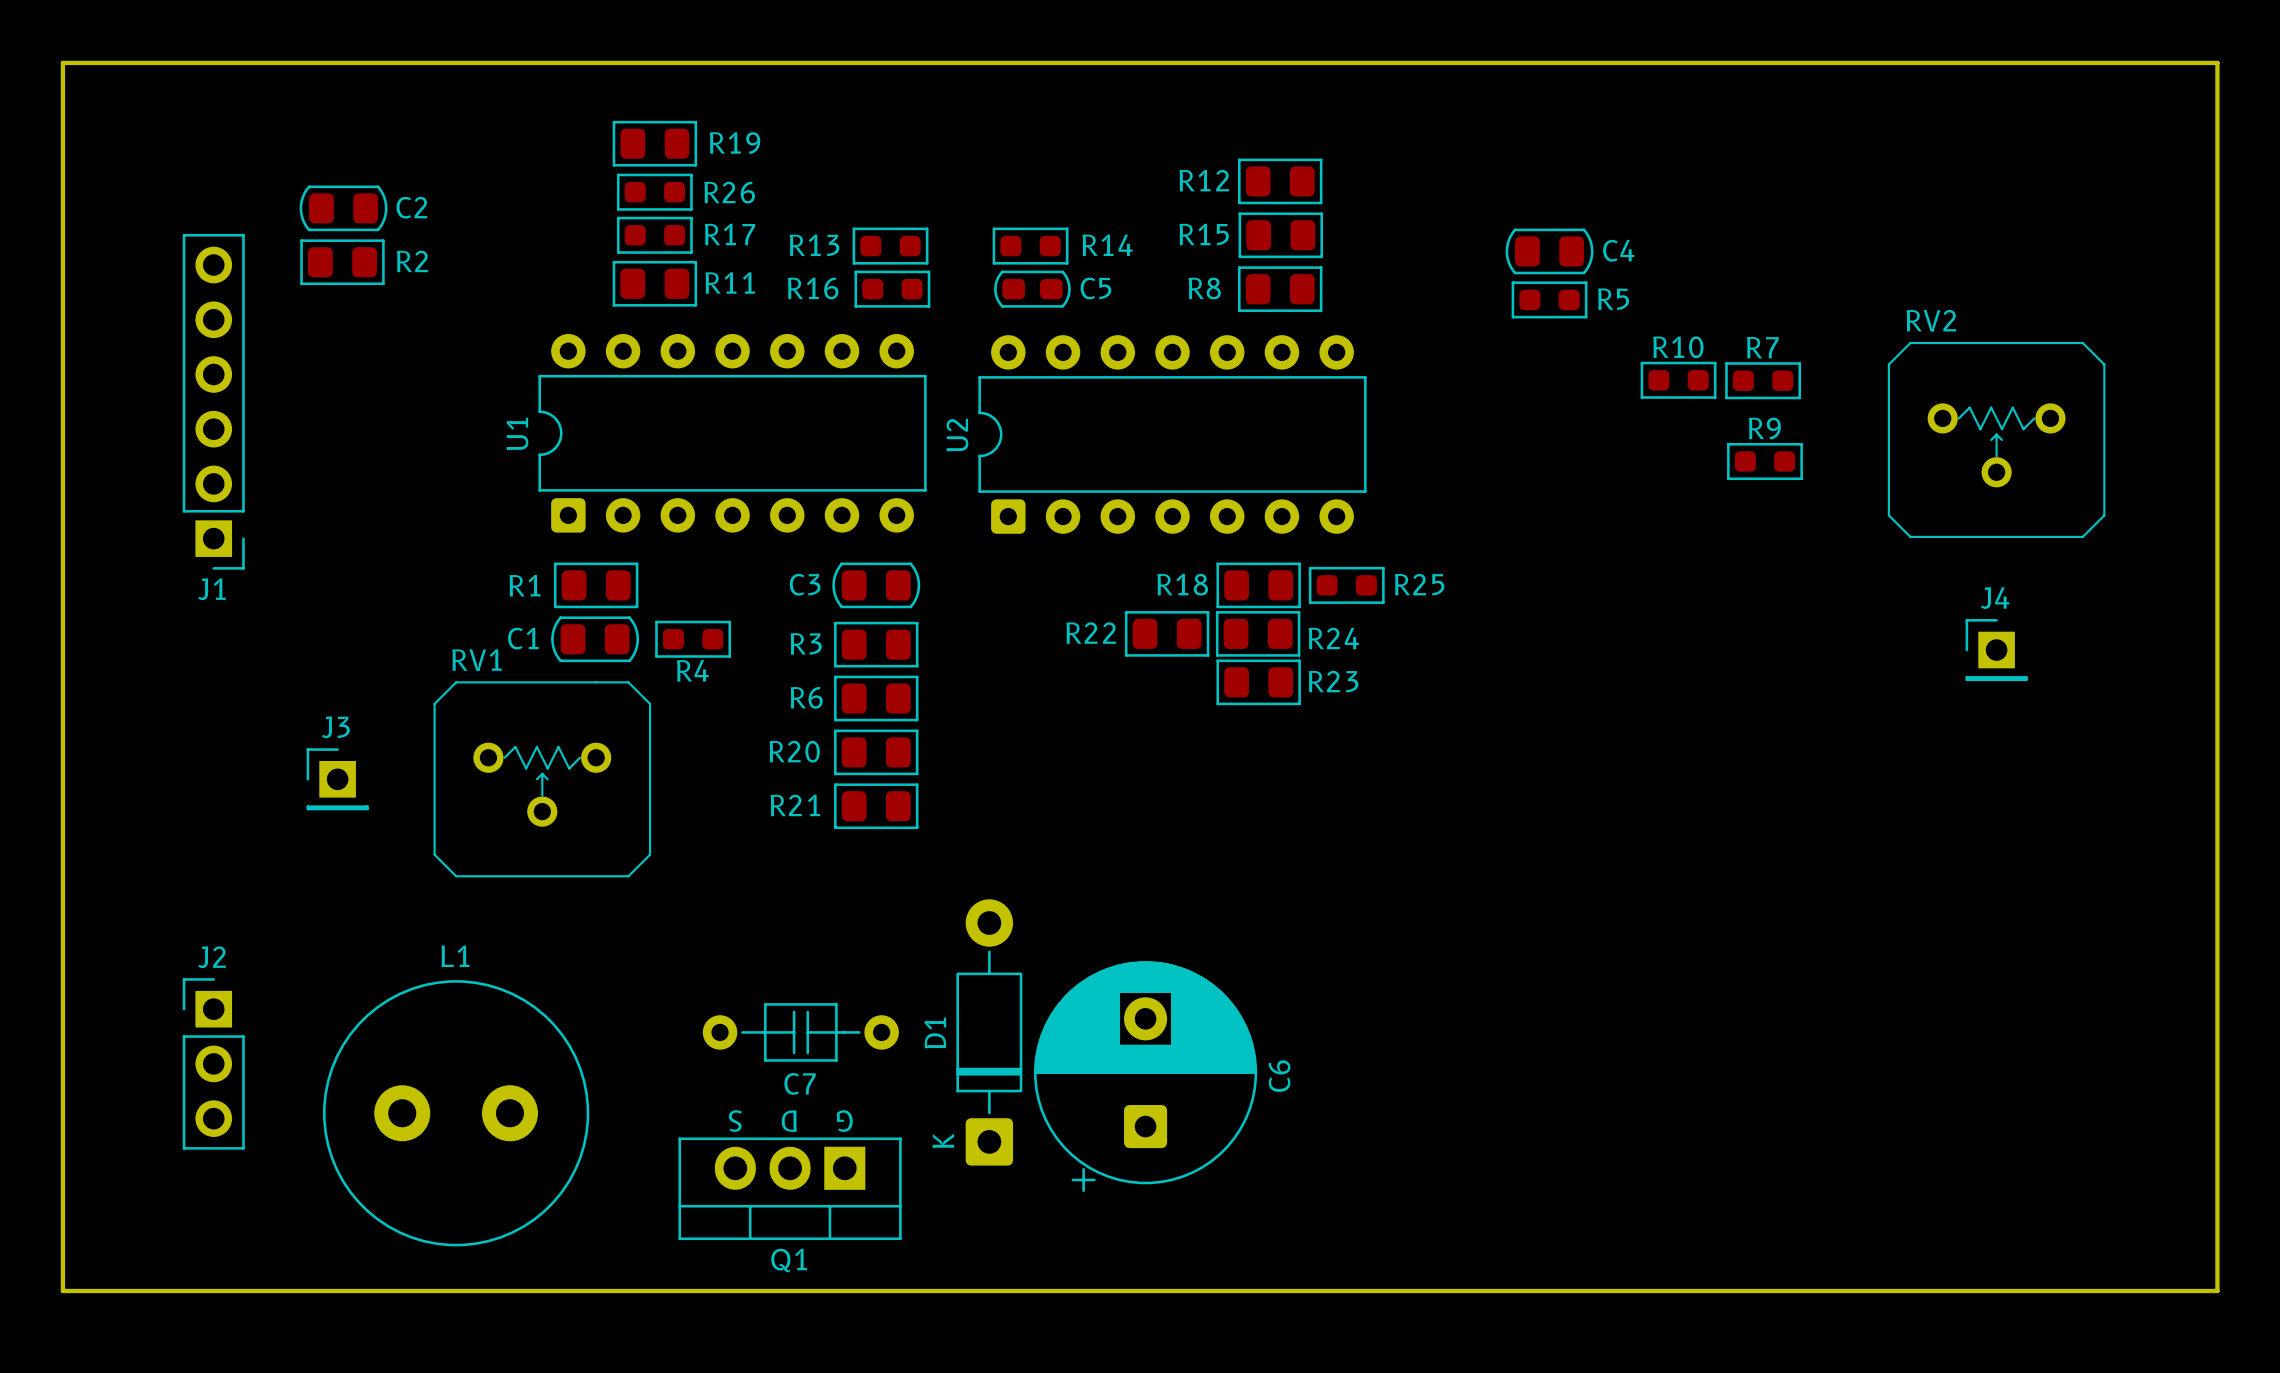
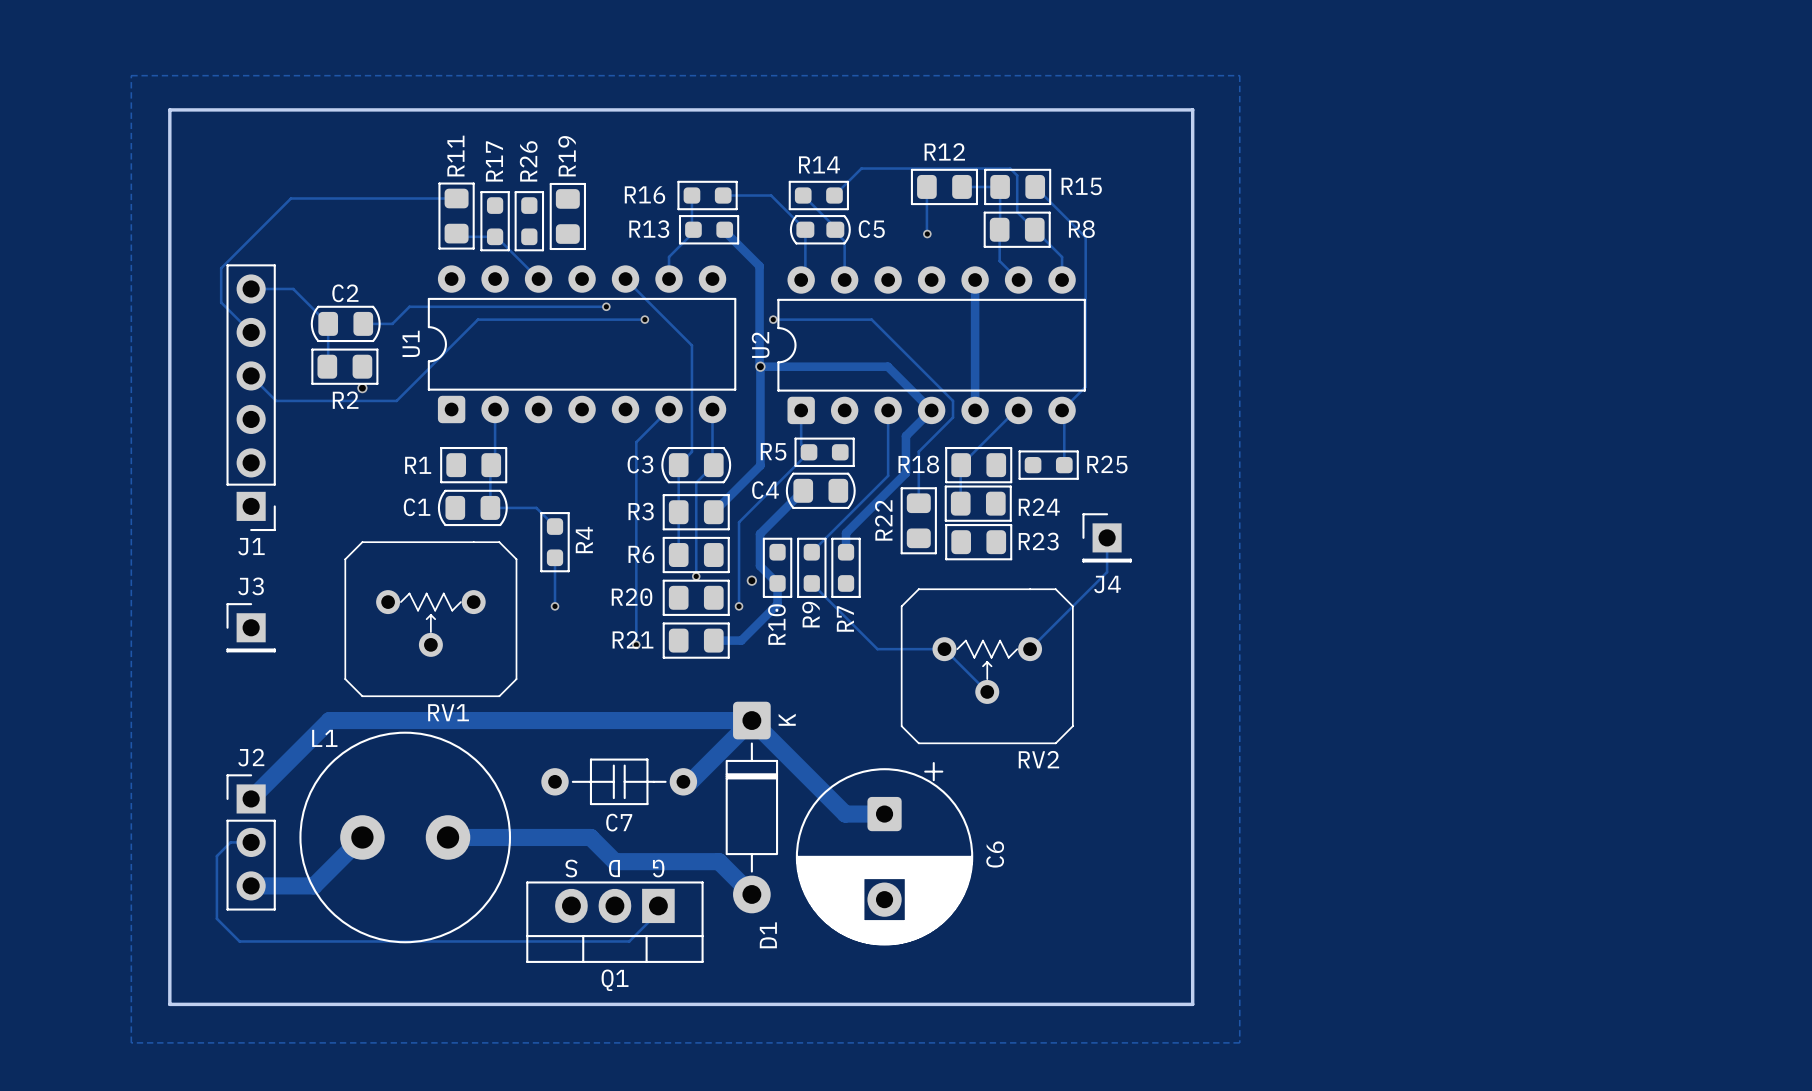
board edge: (62, 62) (2217, 62) (2217, 1291) (62, 1291) (62, 62) -> (169, 109) (169, 1004) (1192, 1004) (1192, 109) (169, 109)
zone outline: none -> (131, 75) (1239, 75) (1239, 1042) (131, 1042) (131, 75)
R19 rotation: 0° (654, 143) -> 90° clockwise (567, 216)
R19 position: (654, 143) -> (567, 216)
R19 name position: R19 (734, 143) -> R19 (567, 156)
R12 name position: R12 (1204, 180) -> R12 (944, 151)
R12 position: (1280, 181) -> (944, 186)
R26 rotation: 0° (654, 192) -> 90° clockwise (529, 221)
R26 position: (654, 192) -> (529, 221)
R26 name position: R26 (729, 192) -> R26 (528, 161)
C2 name position: C2 (411, 207) -> C2 (345, 293)
C2 position: (343, 208) -> (345, 323)
R17 name position: R17 (729, 234) -> R17 (494, 161)
R15 name position: R15 (1204, 234) -> R15 (1081, 186)
R17 rotation: 0° (654, 235) -> 90° clockwise (495, 221)
R17 position: (654, 235) -> (495, 221)
track: none -> (926, 186) (927, 234)
track: none -> (962, 186) (1000, 186) (999, 261) (1018, 279)
track: none -> (1035, 186) (1085, 237) (1085, 386) (1062, 410) (1064, 412) (1064, 465)
R13 name: R13 (814, 245) -> R16 (644, 195)
R14 name position: R14 (1107, 245) -> R14 (819, 164)
track: none -> (691, 195) (691, 234) (669, 256) (669, 279)
track: none -> (723, 195) (771, 195) (805, 229) (805, 275) (801, 279)
track: none -> (803, 195) (835, 227) (835, 231) (844, 241) (844, 279)
track: none -> (834, 195) (861, 168) (1010, 168) (1017, 175) (1017, 212) (1062, 257) (1062, 279)
track: none -> (456, 198) (290, 198) (221, 268) (221, 302) (251, 332)
C4 name position: C4 (1618, 250) -> C4 (765, 490)
C4 position: (1549, 251) -> (820, 490)
R2 name position: R2 (412, 261) -> R2 (345, 400)
R2 position: (342, 262) -> (344, 366)
R11 name position: R11 (730, 282) -> R11 (455, 156)
R11 rotation: 0° (654, 283) -> 90° clockwise (456, 216)
R11 position: (654, 283) -> (456, 216)
R16 name: R16 (813, 288) -> R13 (649, 229)
R8 name position: R8 (1204, 288) -> R8 (1081, 229)
track: none -> (723, 229) (759, 266) (760, 366)
track: none -> (456, 233) (459, 236) (496, 236) (538, 279)
via: none -> (927, 234)
R5 position: (1549, 299) -> (824, 452)
R5 name position: R5 (1613, 299) -> R5 (773, 451)
RV2 name position: RV2 (1931, 320) -> RV2 (1038, 759)
R10 name position: R10 (1678, 347) -> R10 (776, 624)
R7 name position: R7 (1762, 347) -> R7 (845, 618)
track: none -> (625, 279) (691, 345) (691, 451) (678, 465) (678, 555)
track: none -> (975, 279) (975, 410)
track: none -> (251, 288) (293, 288) (328, 323) (327, 366)
R10 rotation: 0° (1678, 380) -> 90° clockwise (777, 567)
R10 position: (1678, 380) -> (777, 567)
R7 rotation: 0° (1763, 380) -> 90° clockwise (846, 567)
R7 position: (1763, 380) -> (846, 567)
track: none -> (606, 306) (409, 306) (392, 323) (363, 323)
via: none -> (606, 306)
J1 position: (213, 401) -> (251, 397)
track: none -> (644, 319) (477, 319) (396, 400) (276, 400) (251, 375)
via: none -> (644, 319)
track: none -> (773, 319) (871, 319) (953, 400) (953, 417) (918, 451) (918, 503) (911, 495)
via: none -> (773, 319)
R9 name position: R9 (1764, 428) -> R9 (811, 614)
RV2 position: (1996, 439) -> (987, 666)
track: none -> (760, 366) (887, 366) (931, 410) (905, 436) (905, 473) (846, 533) (846, 552)
track: none -> (760, 366) (760, 465) (713, 512)
via: none -> (760, 366)
R9 rotation: 0° (1764, 461) -> 90° clockwise (811, 567)
R9 position: (1764, 461) -> (811, 567)
via: none -> (362, 388)
track: none -> (495, 409) (495, 461) (491, 465) (490, 470) (490, 507) (536, 507) (555, 526)
track: none -> (669, 409) (636, 442) (636, 644)
track: none -> (712, 409) (713, 465) (696, 482) (696, 576)
track: none -> (801, 410) (801, 444) (809, 452) (739, 522) (739, 606)
track: none -> (888, 410) (888, 475) (811, 552)
track: none -> (1018, 410) (1015, 410) (960, 465) (960, 503)
R18 position: (1258, 585) -> (978, 465)
R25 position: (1346, 585) -> (1048, 465)
J4 name position: J4 (1995, 598) -> J4 (1107, 584)
track: none -> (803, 490) (759, 534) (759, 565) (777, 583) (777, 604) (741, 640) (713, 640)
R22 rotation: 0° (1167, 633) -> 90° clockwise (918, 520)
R24 position: (1258, 633) -> (978, 503)
R4 rotation: 0° (693, 639) -> 90° clockwise (555, 542)
J4 position: (1996, 650) -> (1107, 537)
RV1 name position: RV1 (476, 660) -> RV1 (448, 712)
R4 name position: R4 (692, 670) -> R4 (584, 540)
track: none -> (1107, 537) (1107, 572) (1030, 649)
R23 position: (1258, 682) -> (978, 542)
track: none -> (555, 557) (555, 606)
via: none -> (696, 576)
via: none -> (751, 580)
track: none -> (811, 583) (877, 649) (944, 649) (987, 691)
via: none -> (555, 606)
via: none -> (739, 606)
J3 position: (337, 779) -> (251, 627)
via: none -> (636, 644)
track: none -> (751, 720) (845, 814) (884, 814)
track: none -> (751, 720) (329, 720) (251, 798)
track: none -> (751, 720) (690, 781) (683, 781)
L1 name position: L1 (455, 956) -> L1 (324, 738)
C7 position: (800, 1032) -> (619, 781)
D1 rotation: 0° (989, 1032) -> 180° (751, 807)
D1 name position: D1 (935, 1033) -> D1 (768, 935)
track: none -> (362, 837) (313, 885) (251, 885)
track: none -> (448, 837) (590, 837) (614, 861) (719, 861) (751, 894)
track: none -> (251, 842) (230, 842) (216, 856) (216, 918) (239, 941) (629, 941) (658, 912) (658, 905)
J2 position: (213, 1063) -> (251, 842)
C6 rotation: 0° (1145, 1076) -> 180° (884, 853)
L1 position: (456, 1113) -> (405, 837)
Q1 position: (790, 1188) -> (614, 922)

